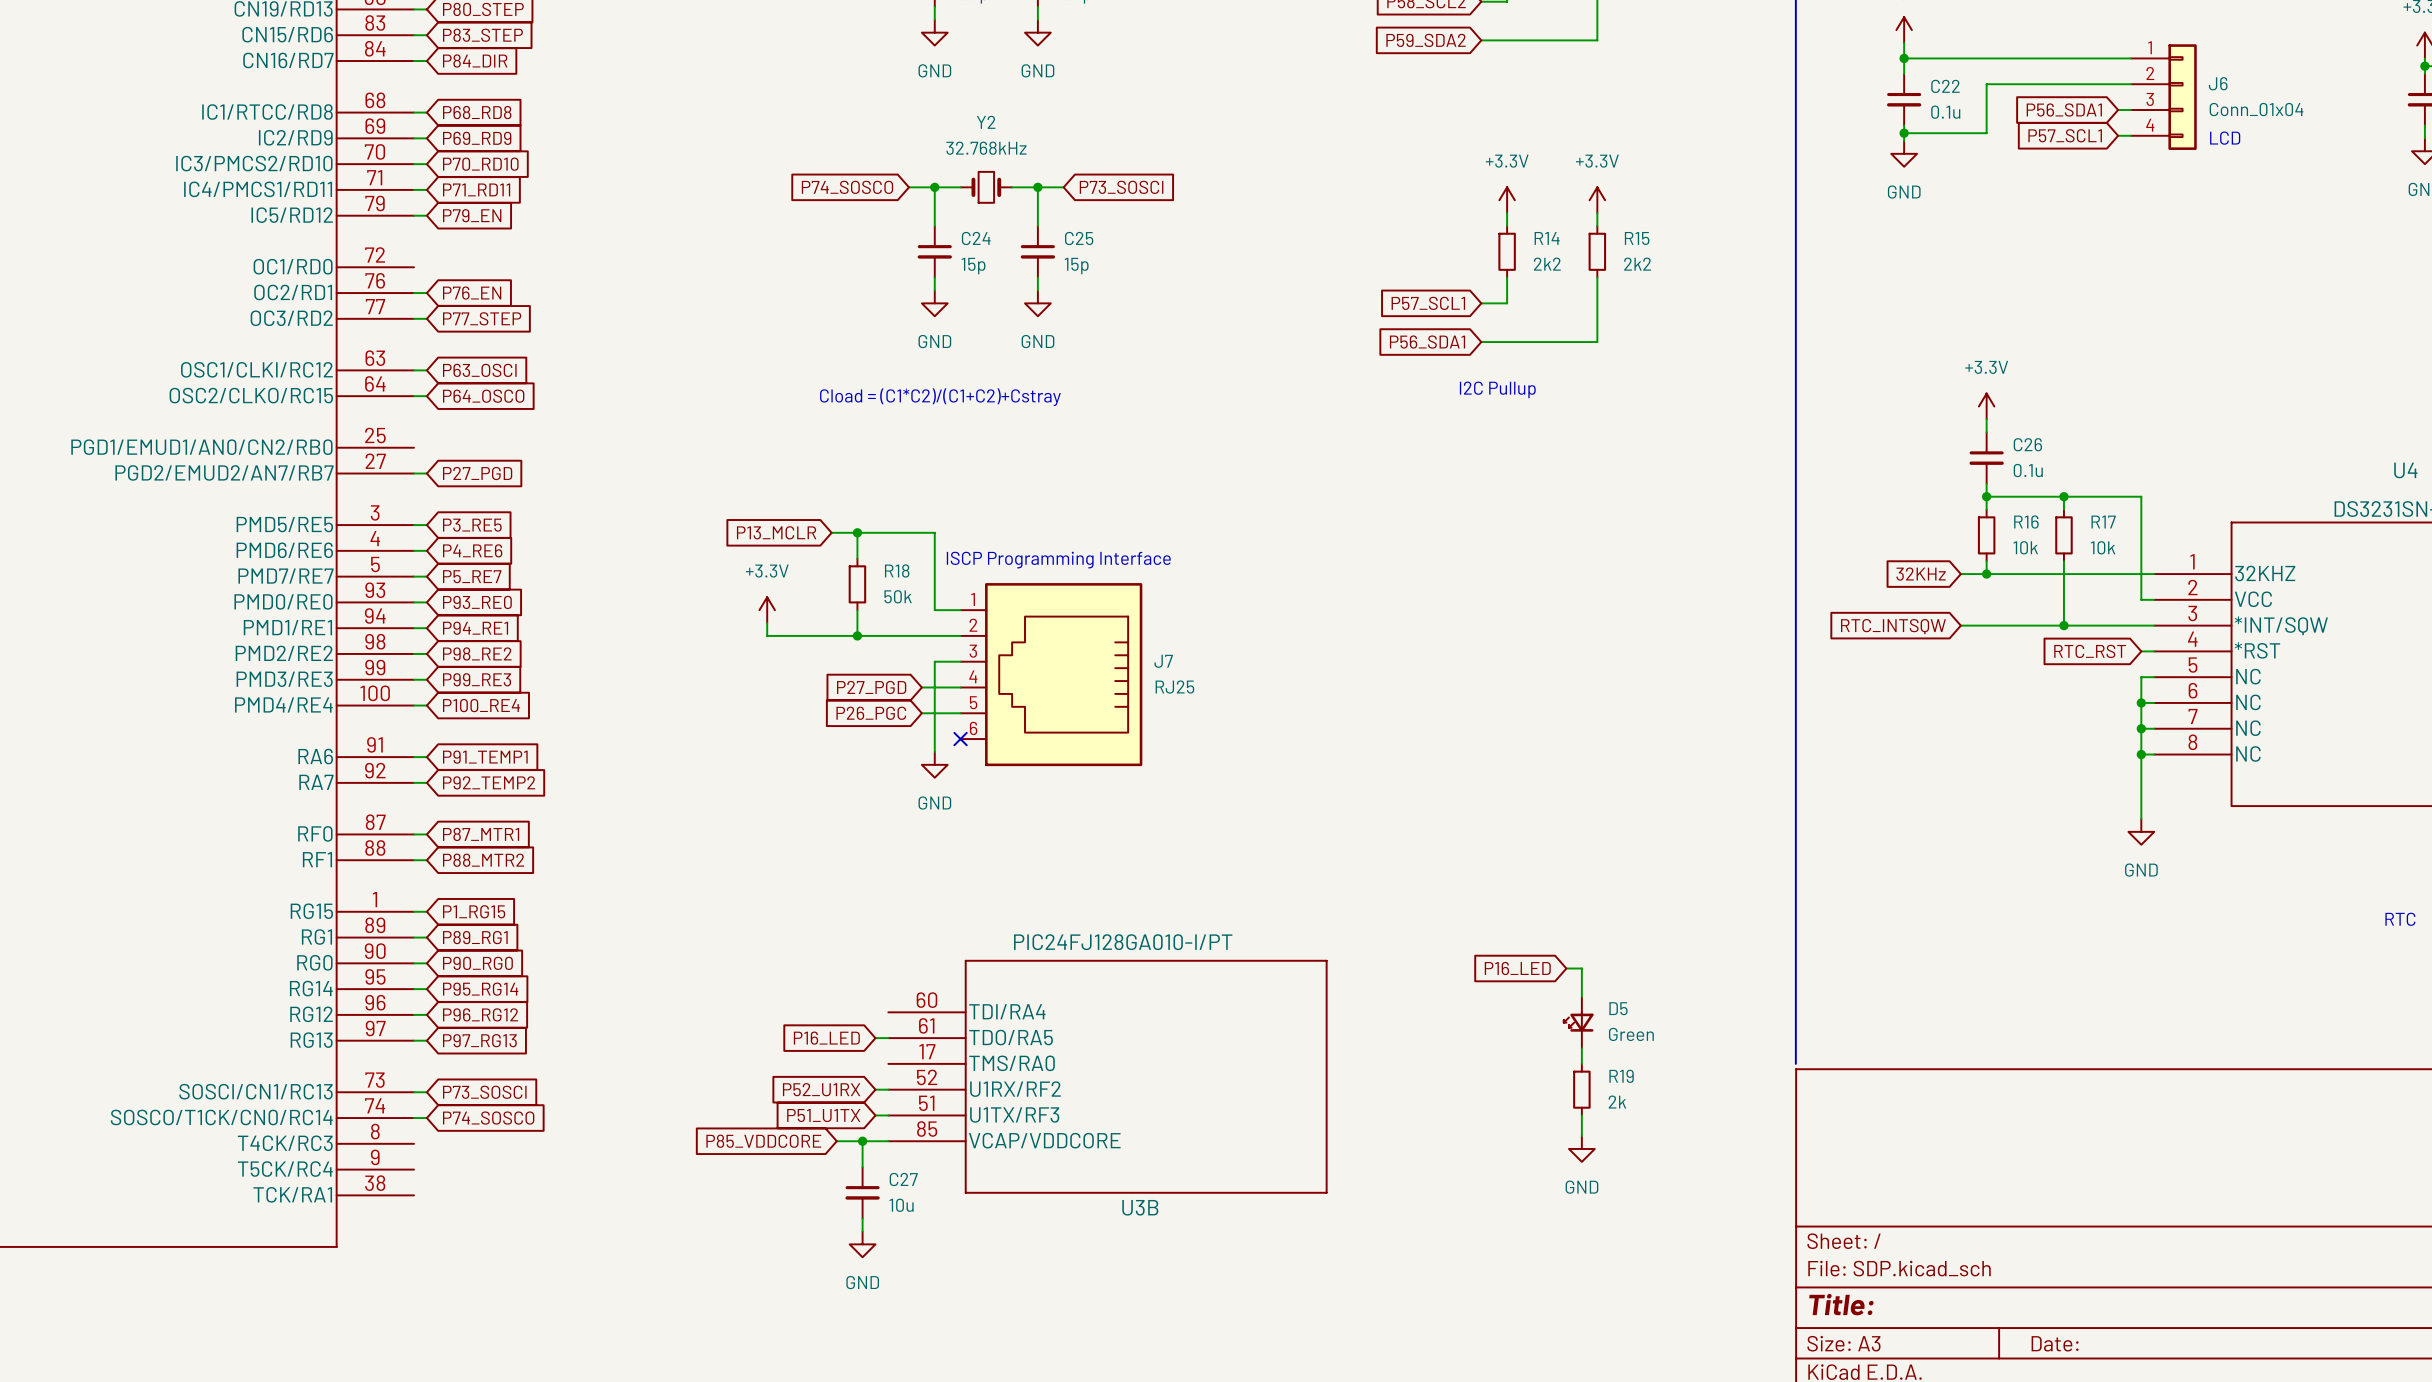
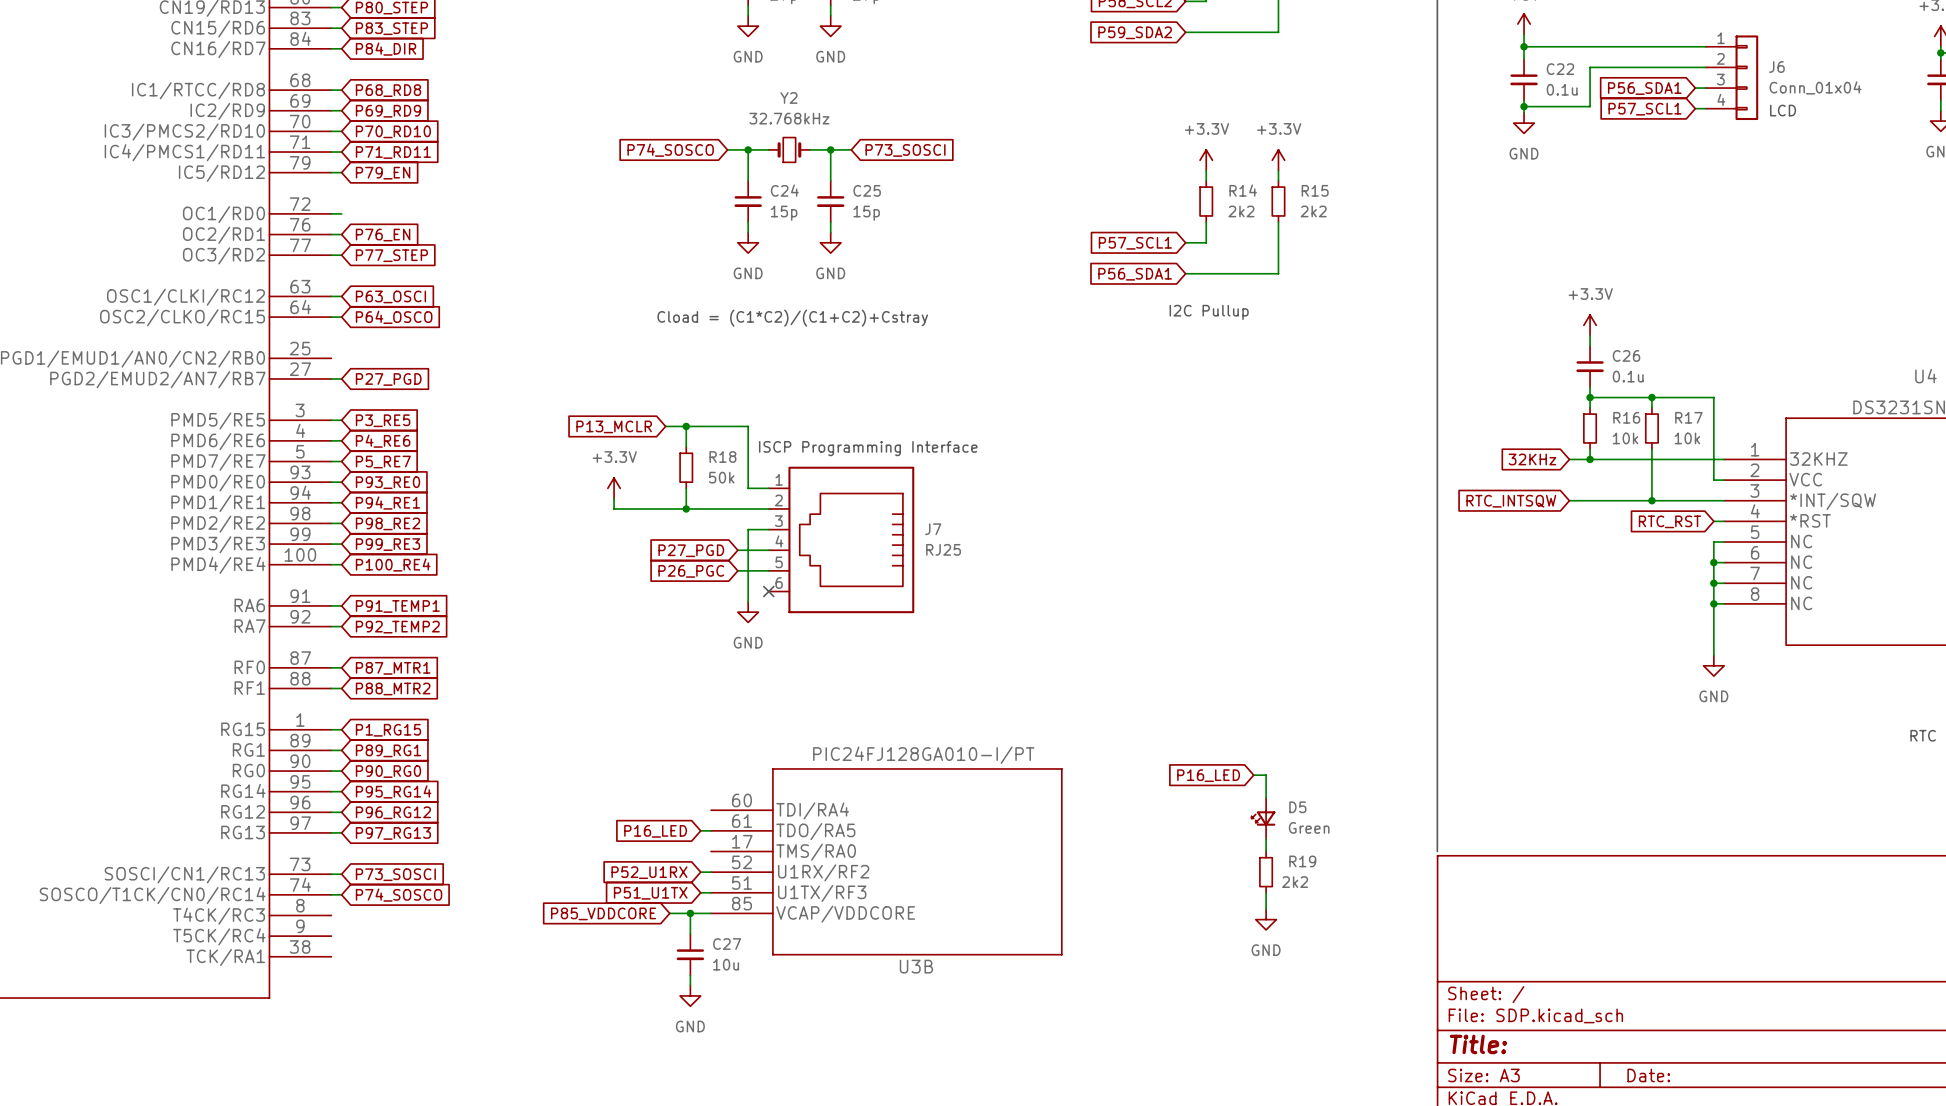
wire: none -> (331, 213) (341, 213)
R19 value: 2k (1617, 1102) -> 2k2 (1295, 882)

